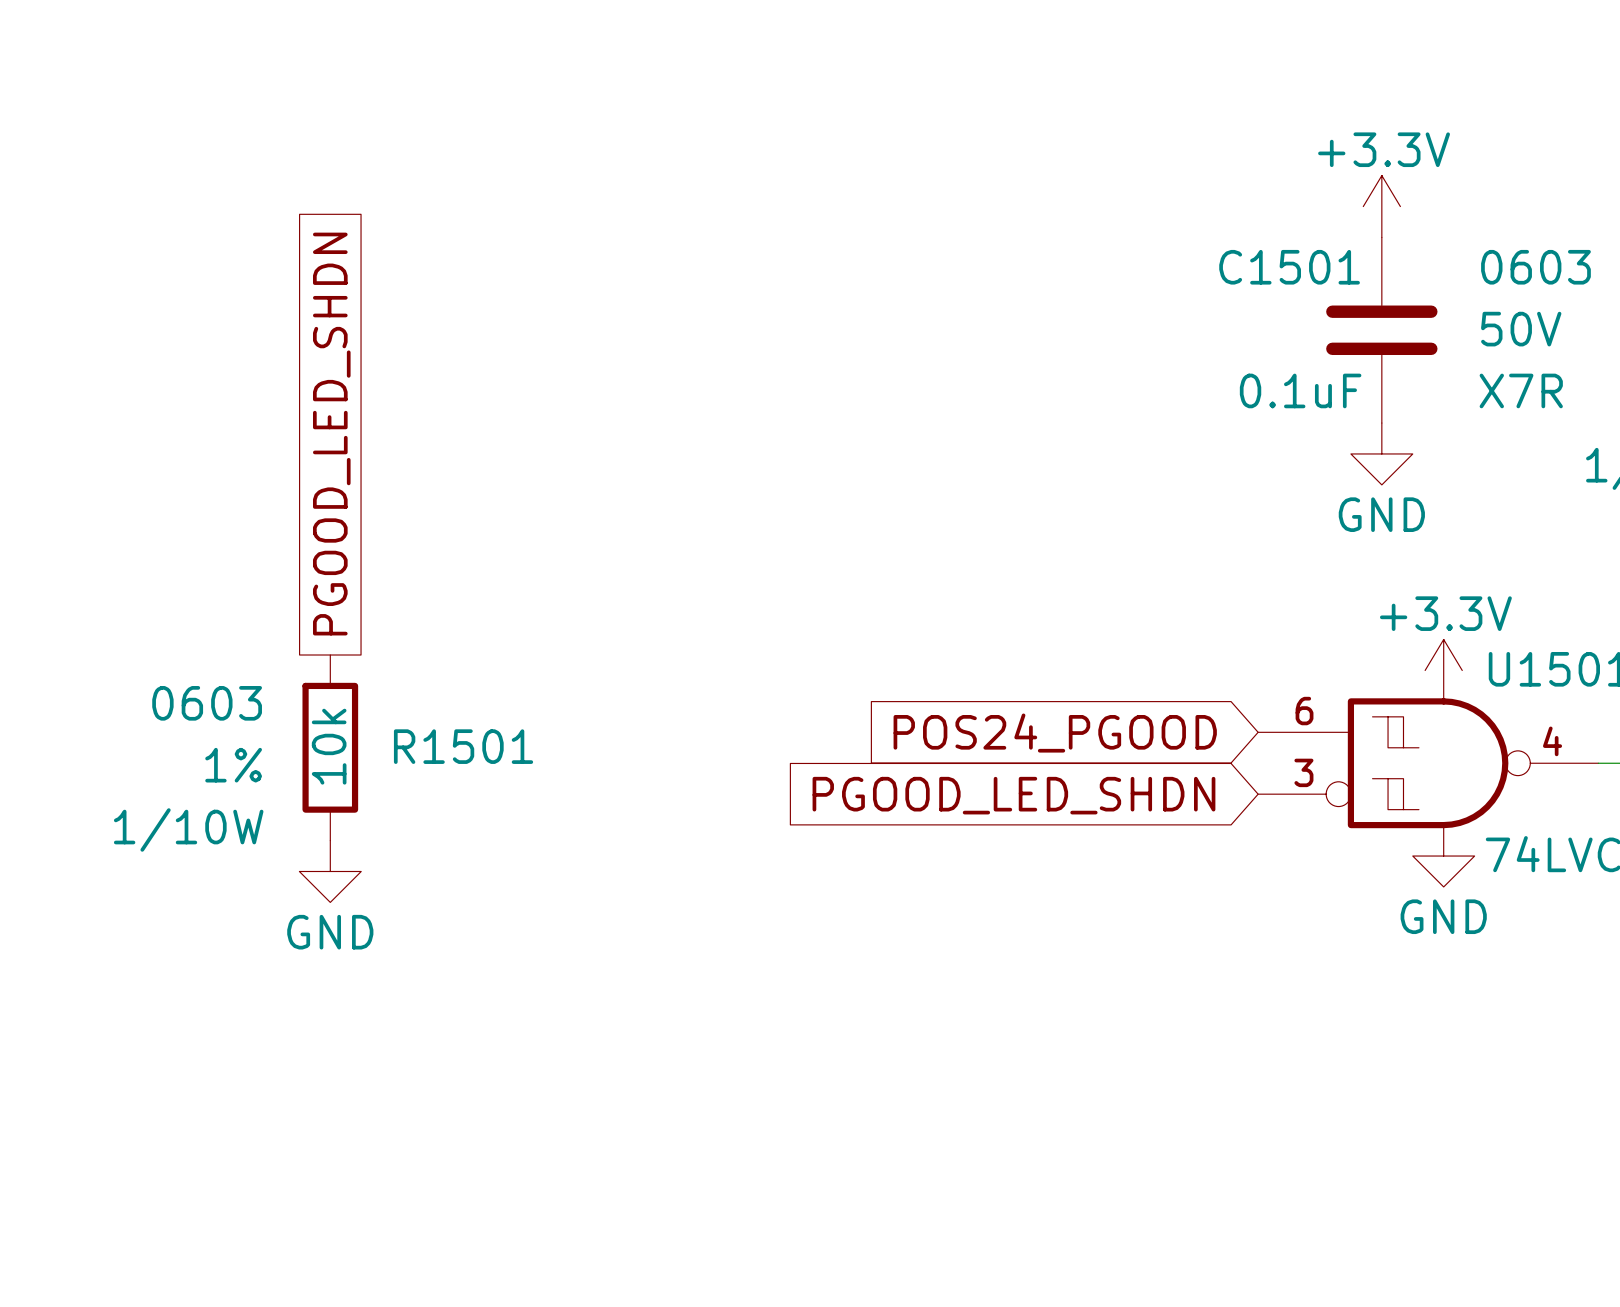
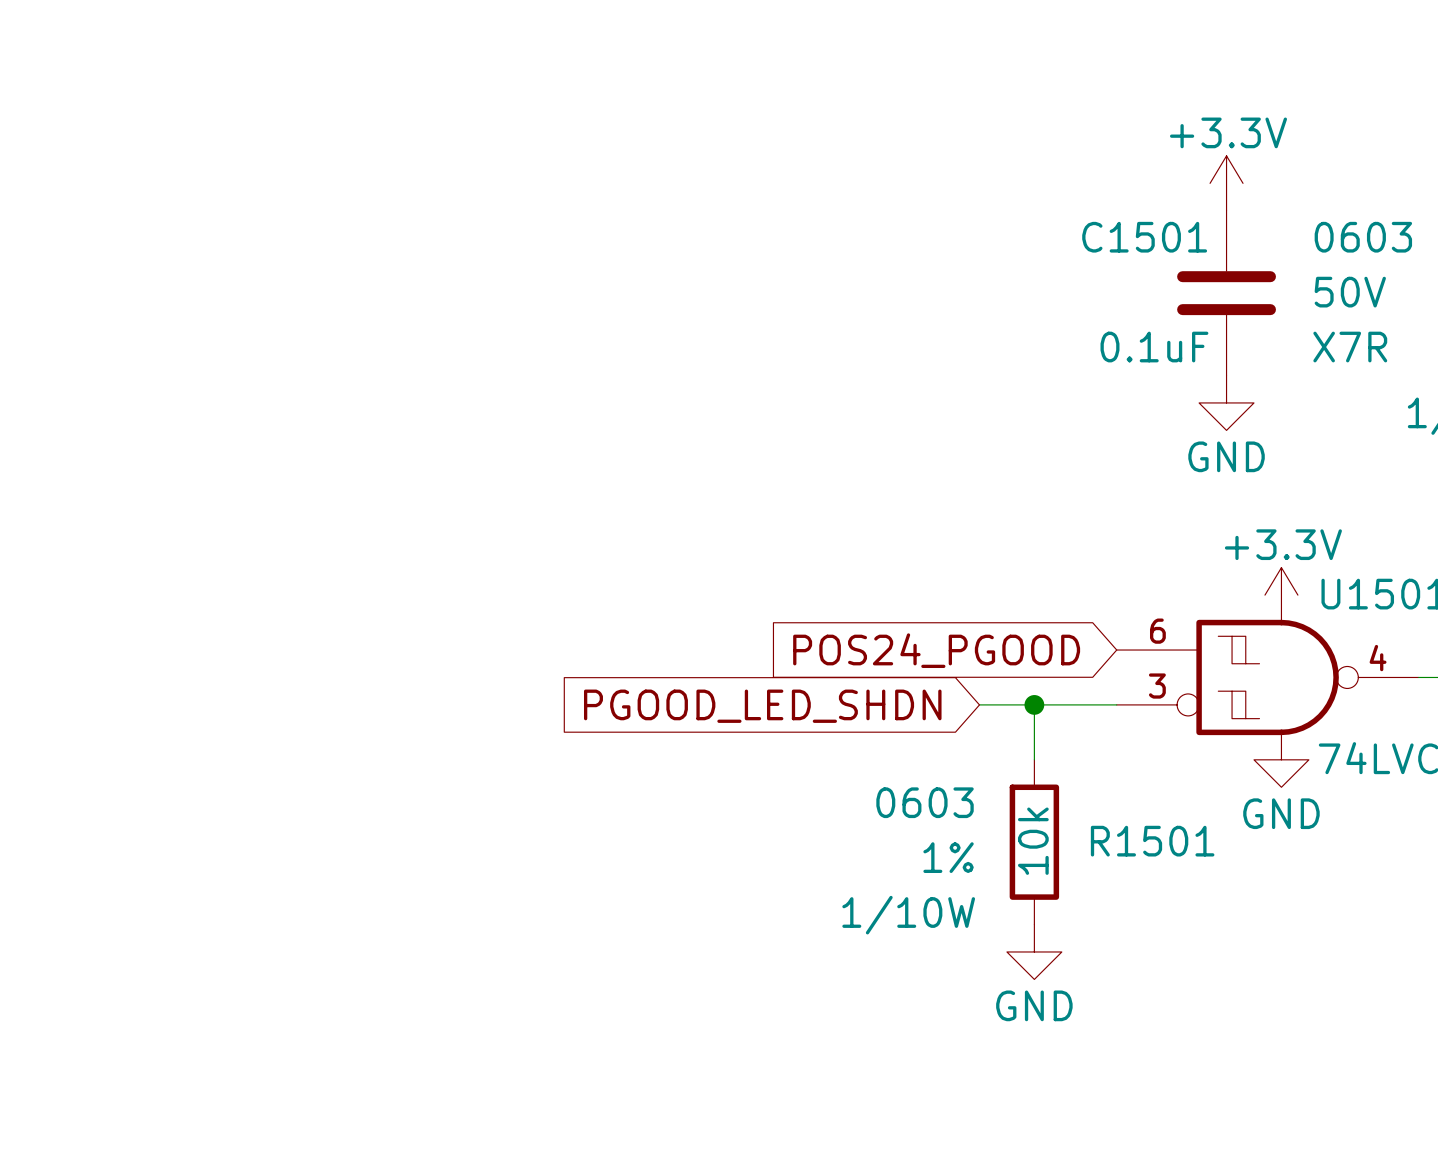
global label: PGOOD_LED_SHDN (331, 434) -> none
R1501 position: (330, 747) -> (1034, 842)
wire: none -> (979, 704) (1116, 704)
wire: none -> (1034, 704) (1034, 759)
junction: none -> (1034, 704)
global label position: PGOOD_LED_SHDN (1013, 795) -> PGOOD_LED_SHDN (762, 706)
power symbol: GND (330, 871) -> none
power symbol: none -> GND (1034, 951)

